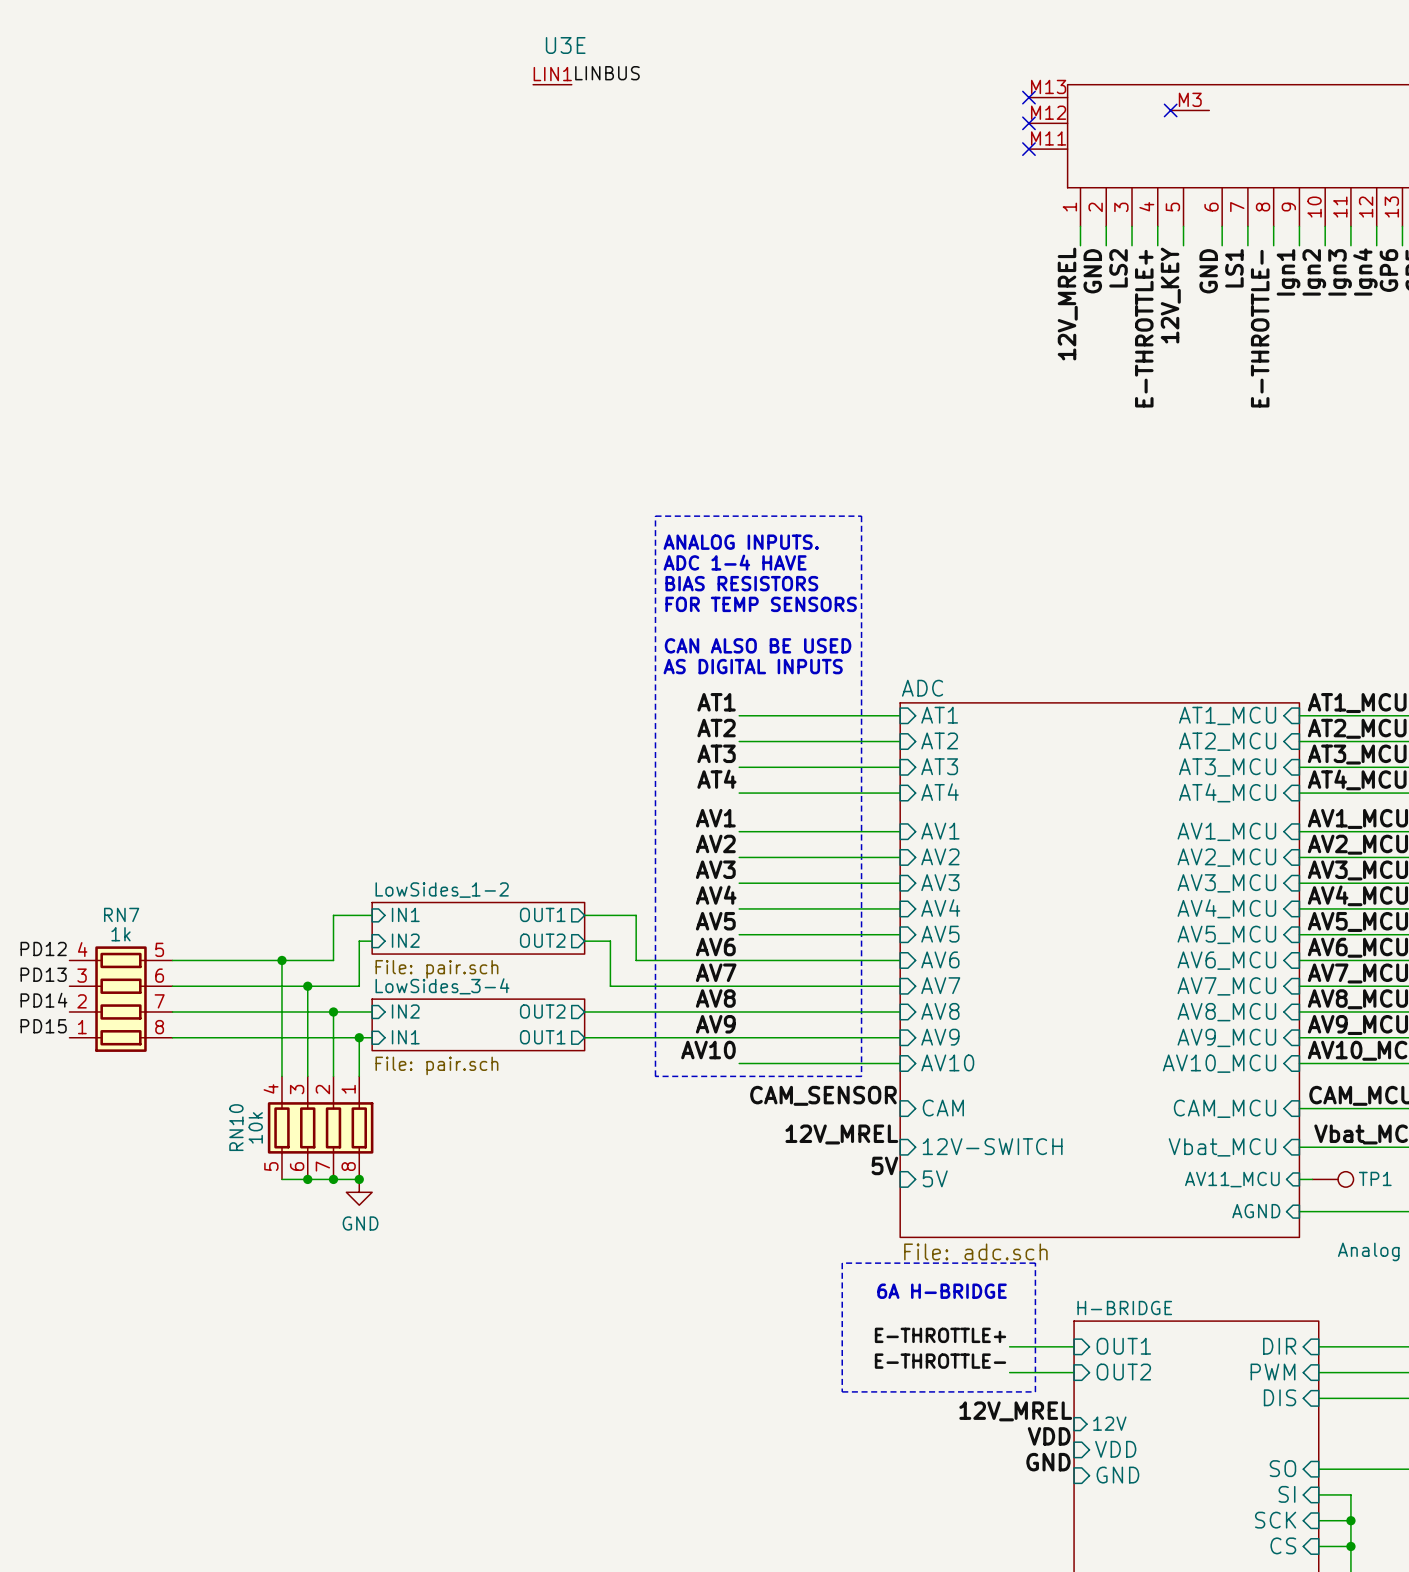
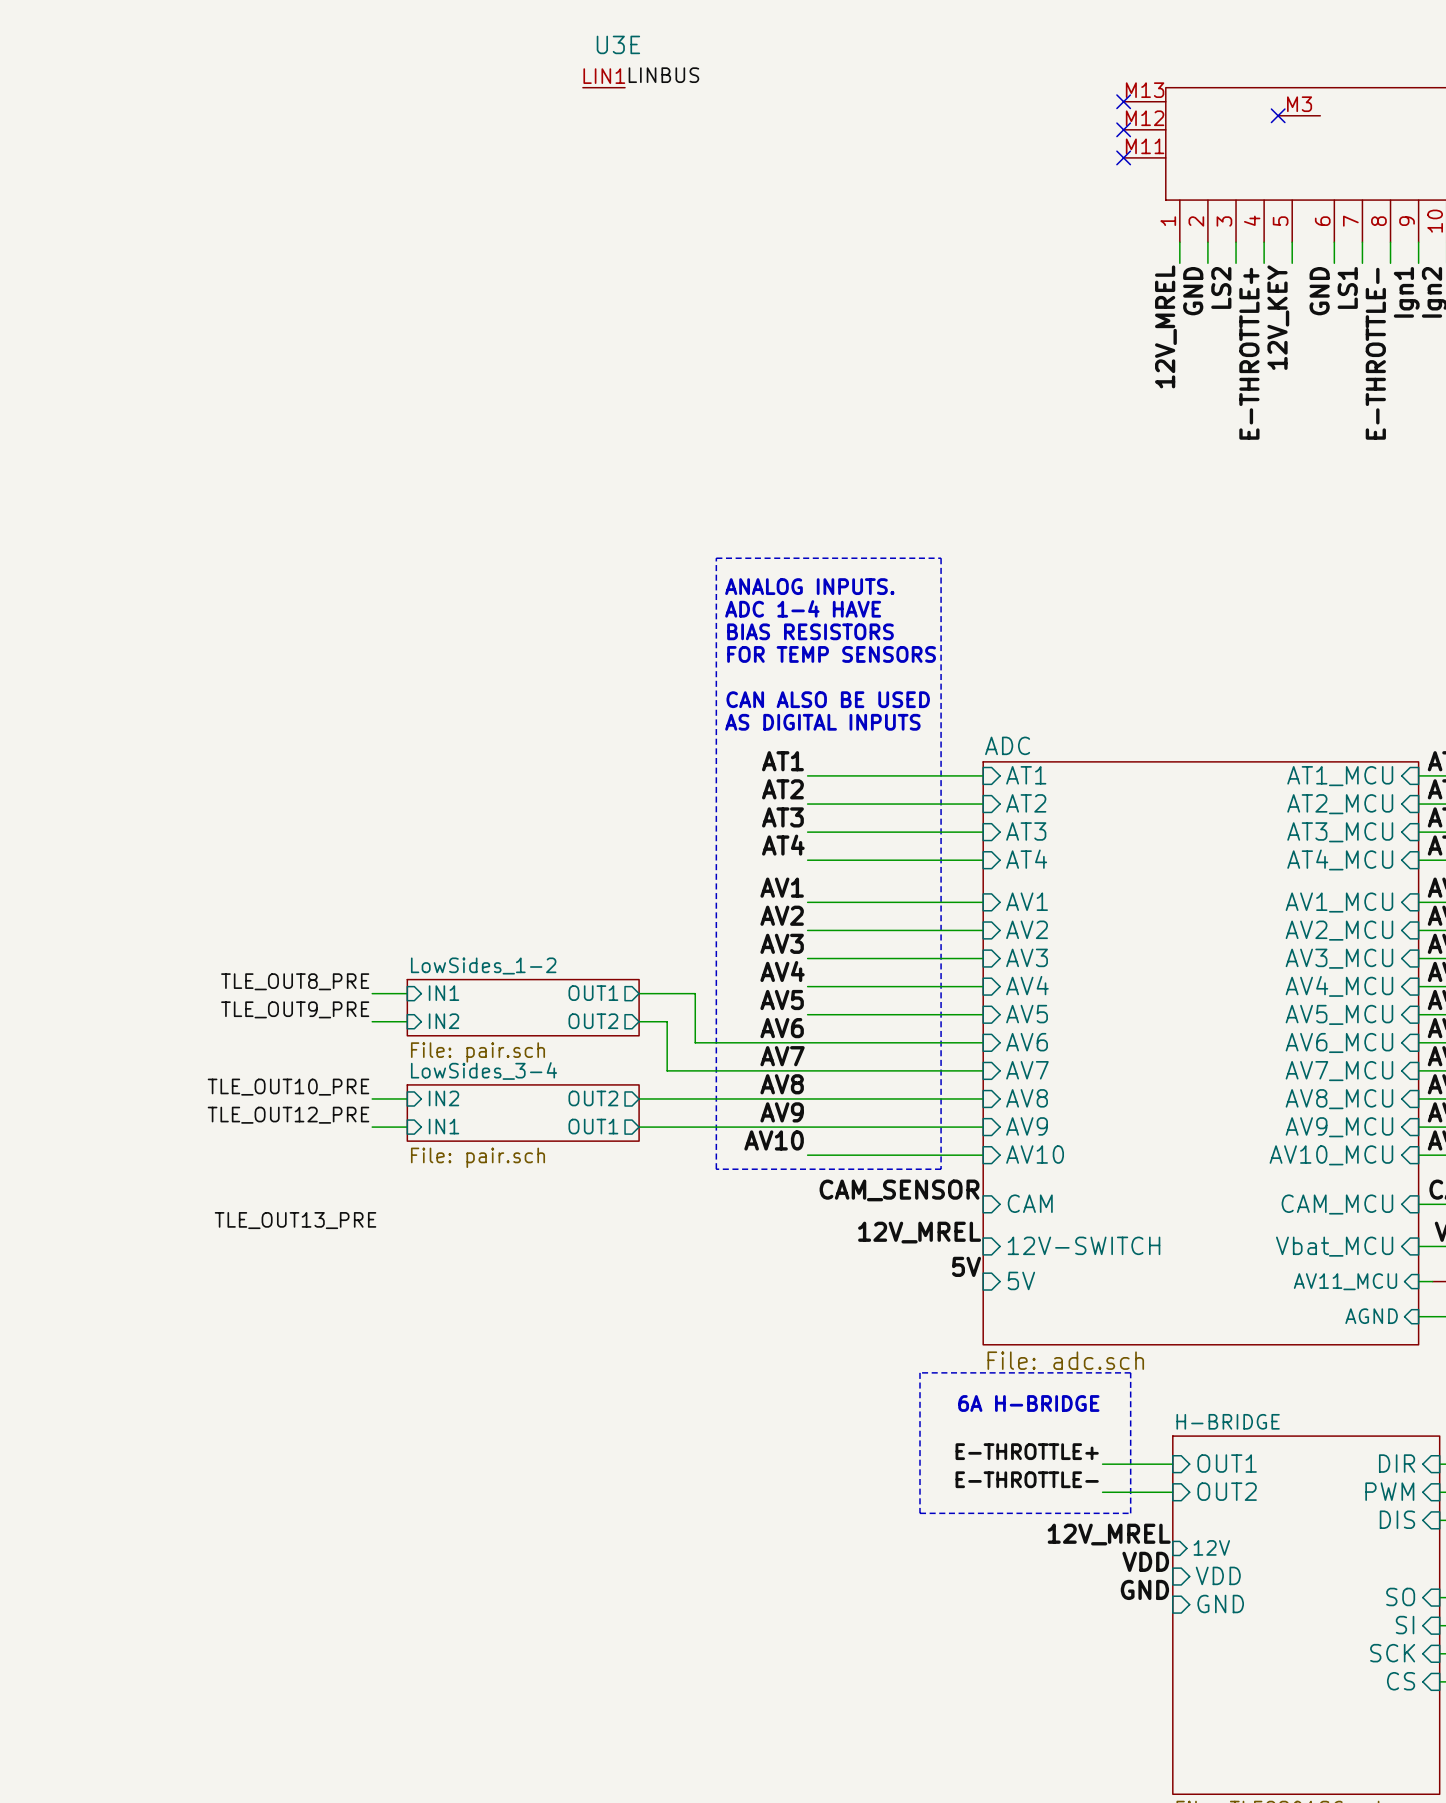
label: none -> TLE_OUT8_PRE (295, 981)
wire: (339, 915) (333, 915) (333, 960) (172, 960) -> none
label: none -> TLE_OUT9_PRE (295, 1009)
wire: (359, 941) (359, 986) (172, 986) -> (393, 1021) (372, 1021)
label: PD12 (43, 948) -> none
wire: (281, 960) (281, 1076) -> none
junction: (281, 960) -> none
label: PD13 (43, 974) -> none
wire: (307, 986) (307, 1076) -> none
junction: (307, 986) -> none
RN7: 1k (121, 999) -> none
label: PD14 (43, 1000) -> none
label: none -> TLE_OUT10_PRE (288, 1087)
wire: (172, 1011) (339, 1011) -> none
wire: (333, 1011) (333, 1076) -> none
junction: (333, 1011) -> none
label: PD15 (43, 1026) -> none
label: none -> TLE_OUT12_PRE (288, 1115)
wire: (172, 1037) (339, 1037) -> none
wire: (359, 1037) (359, 1076) -> none
junction: (359, 1037) -> none
label: none -> TLE_OUT13_PRE (295, 1220)
RN10: 10k (320, 1127) -> none
wire: (281, 1179) (359, 1179) -> none
junction: (307, 1179) -> none
junction: (333, 1179) -> none
junction: (359, 1179) -> none
power symbol: GND (359, 1192) -> none

